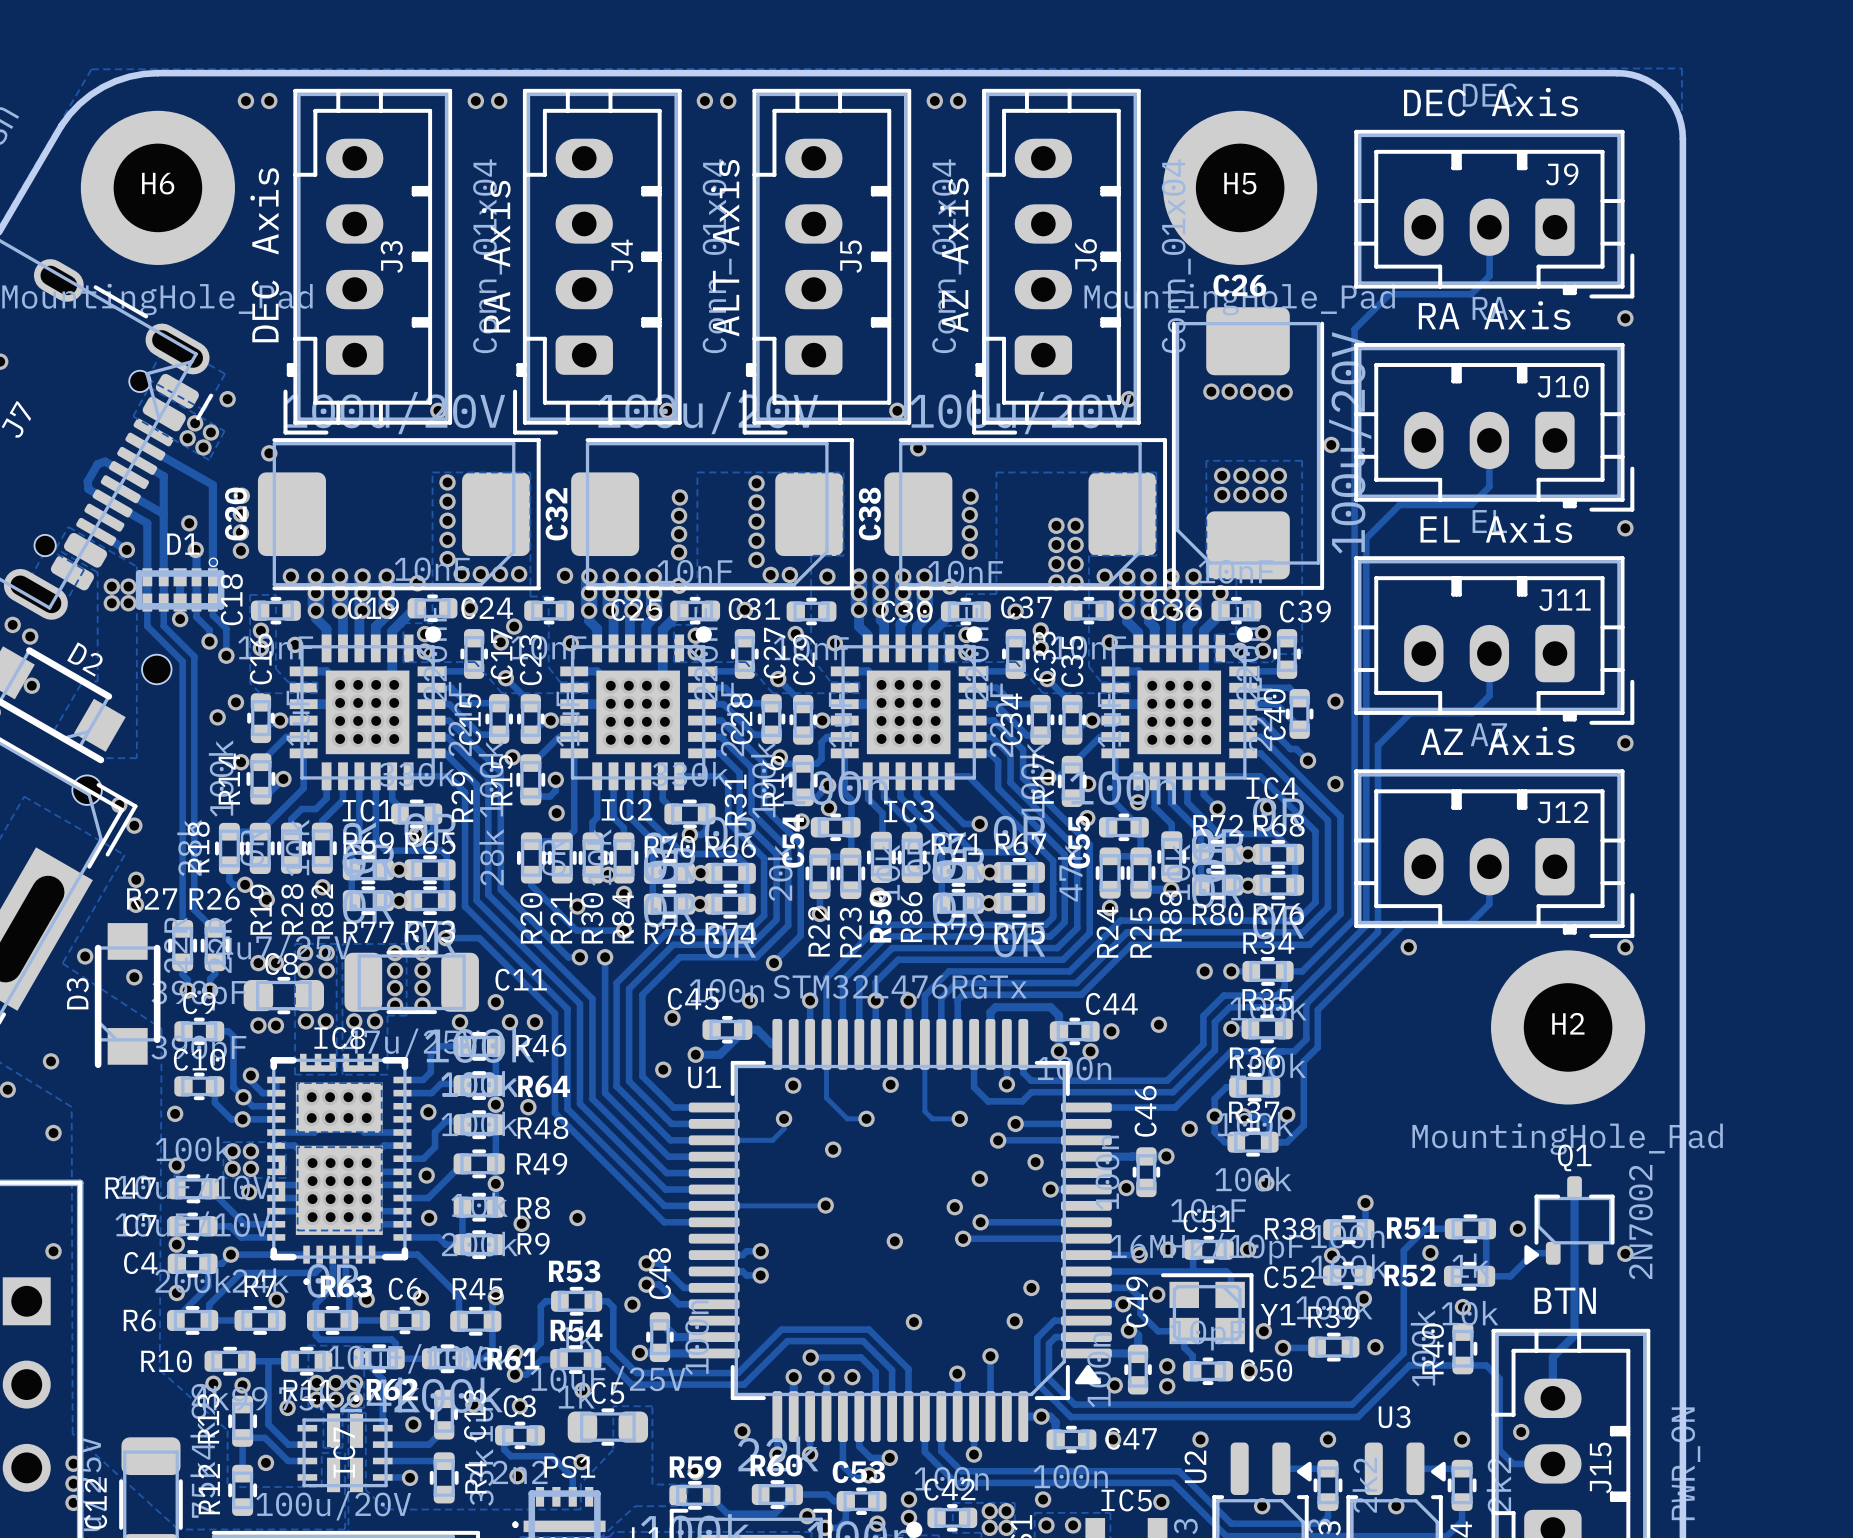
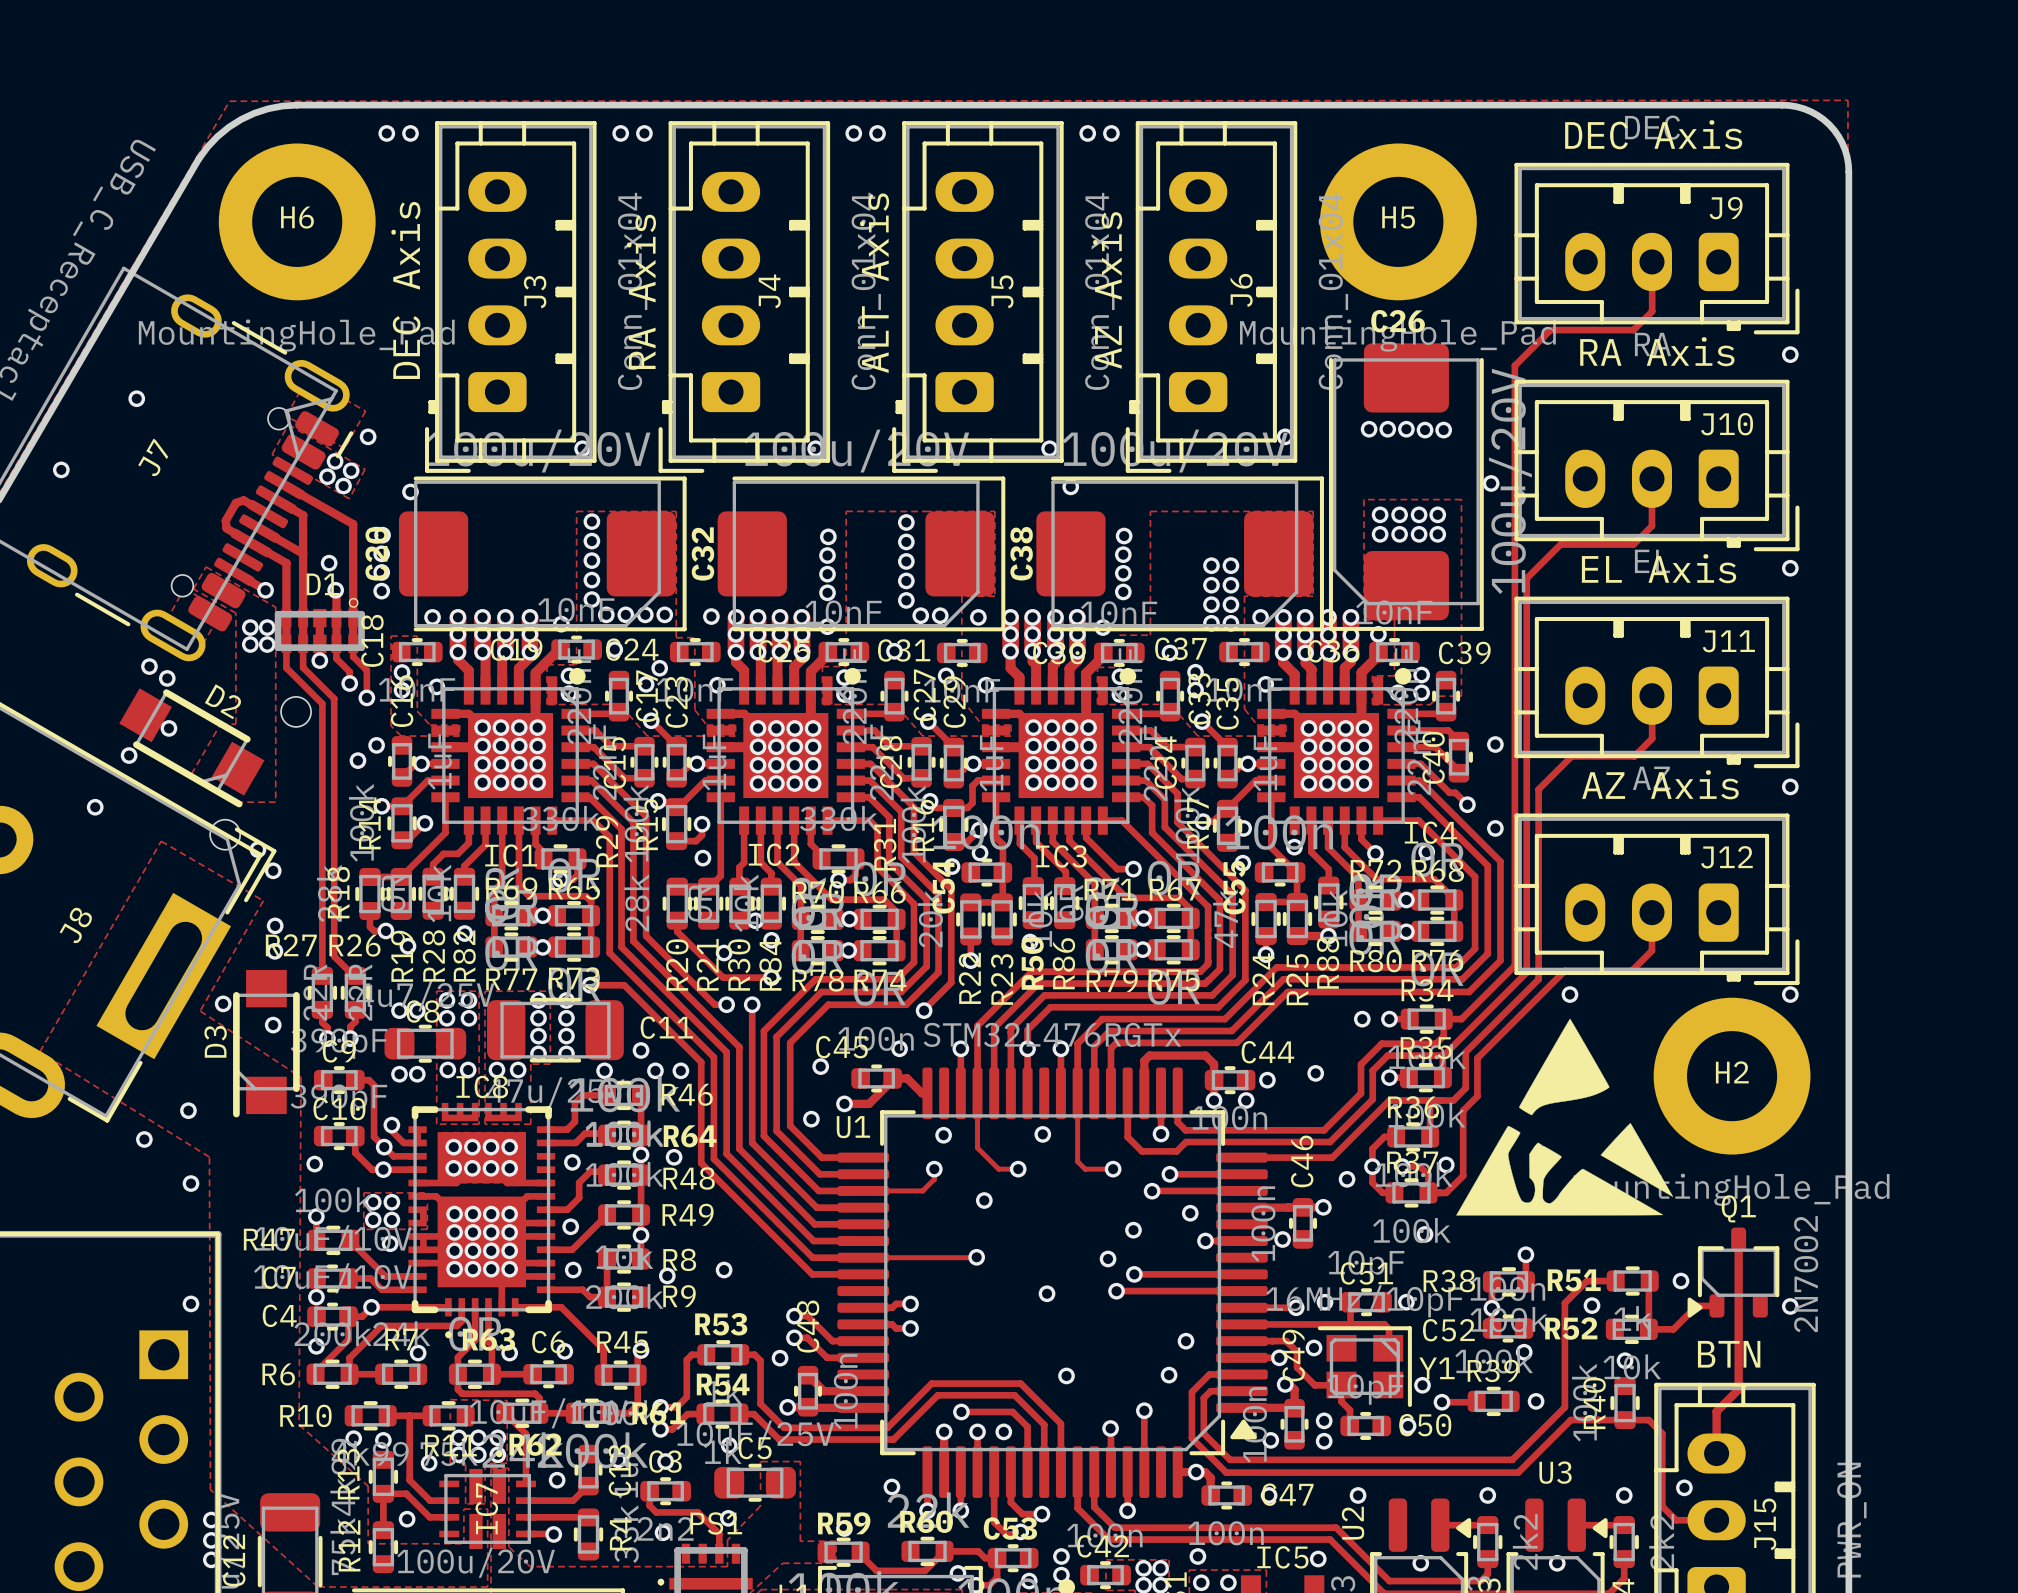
drawing: none -> [1456, 1018, 1673, 1216]

